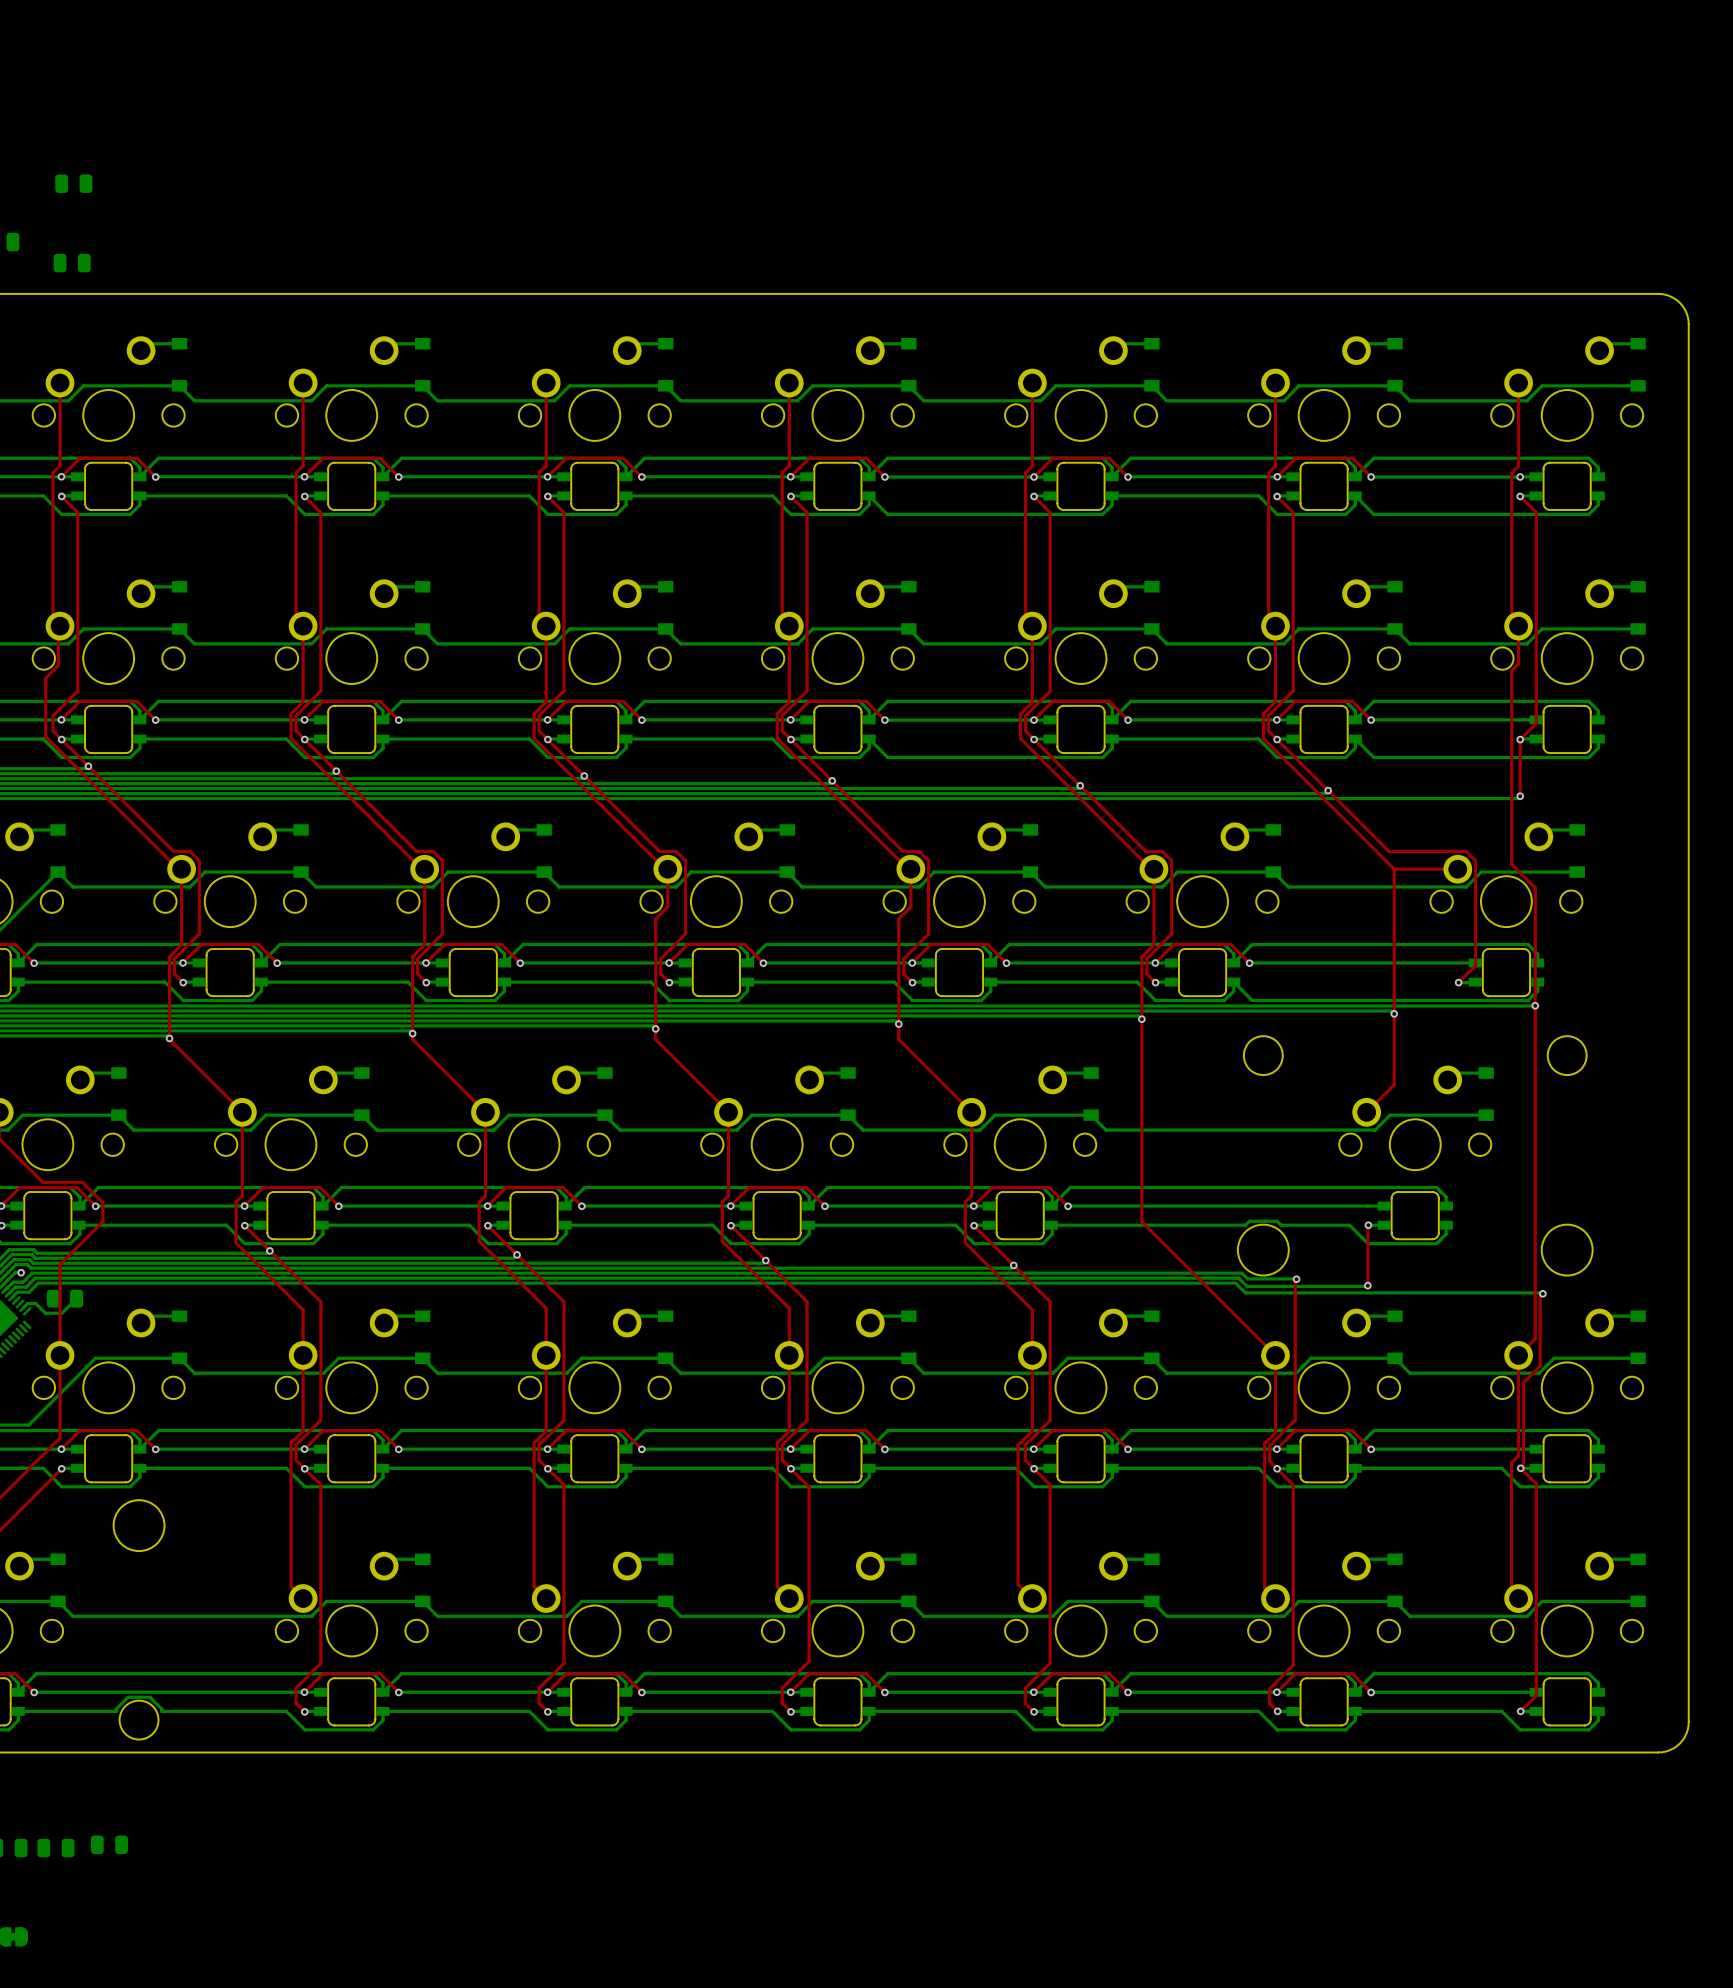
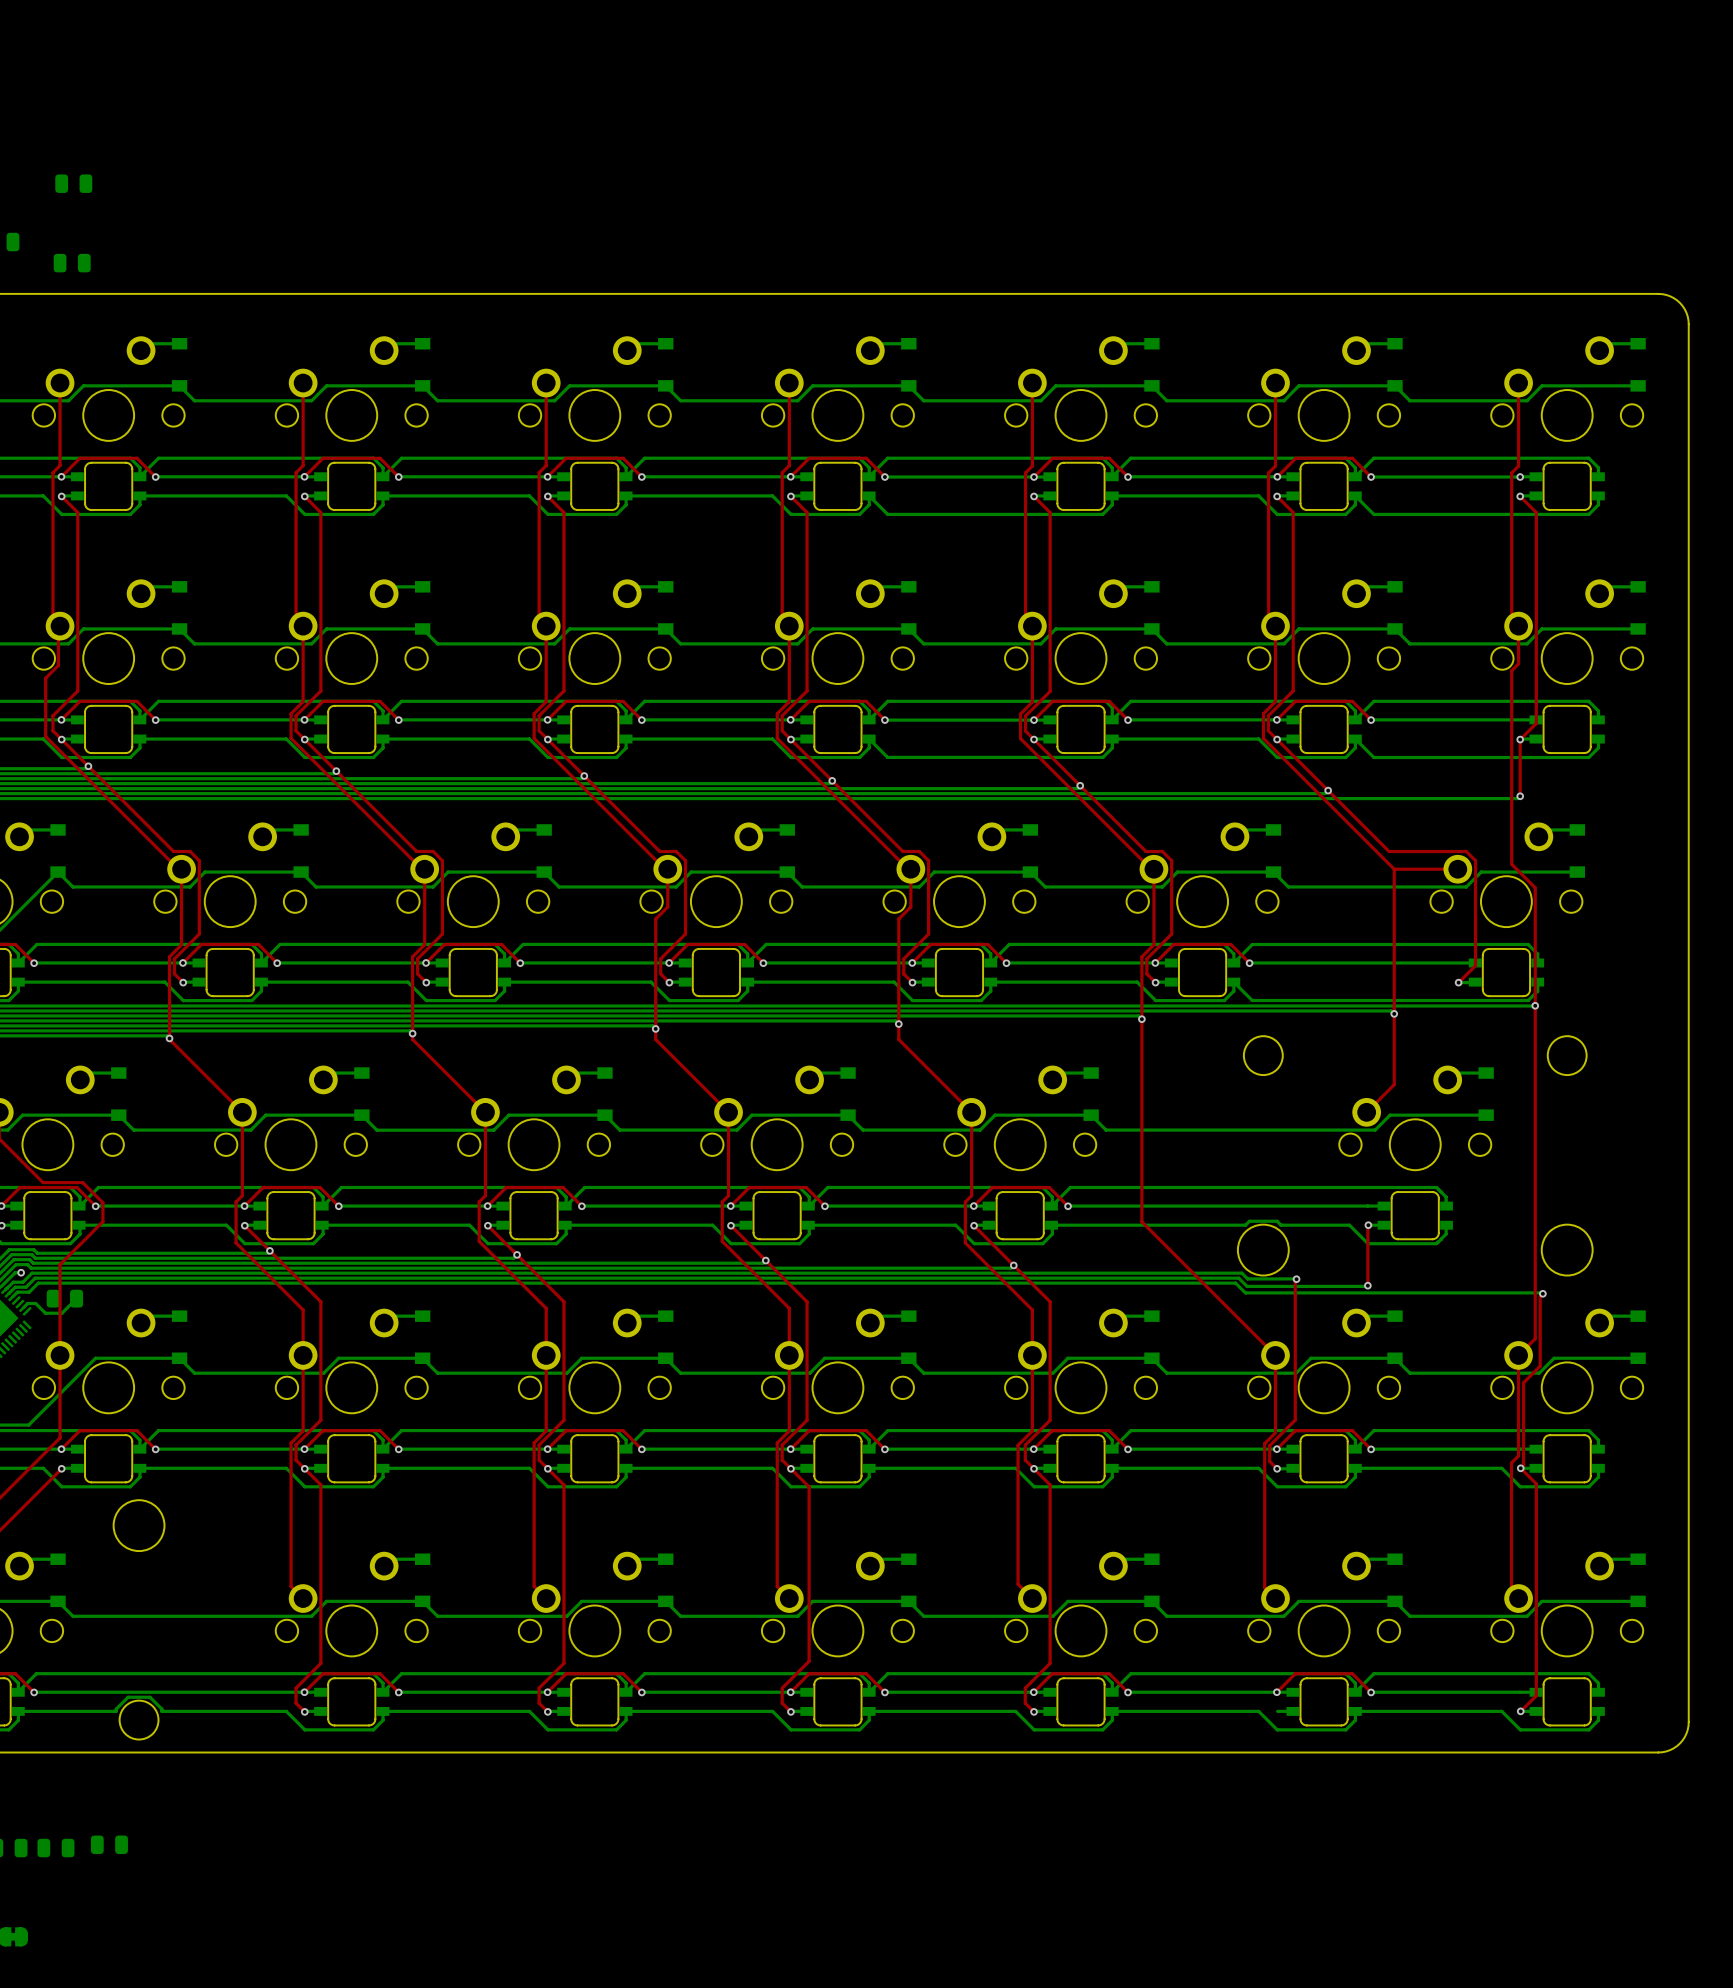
top track: (1277, 1468) (1293, 1484) (1293, 1665) (1269, 1688) (1269, 1703) (1277, 1711) -> none
via: (1277, 1711) -> none

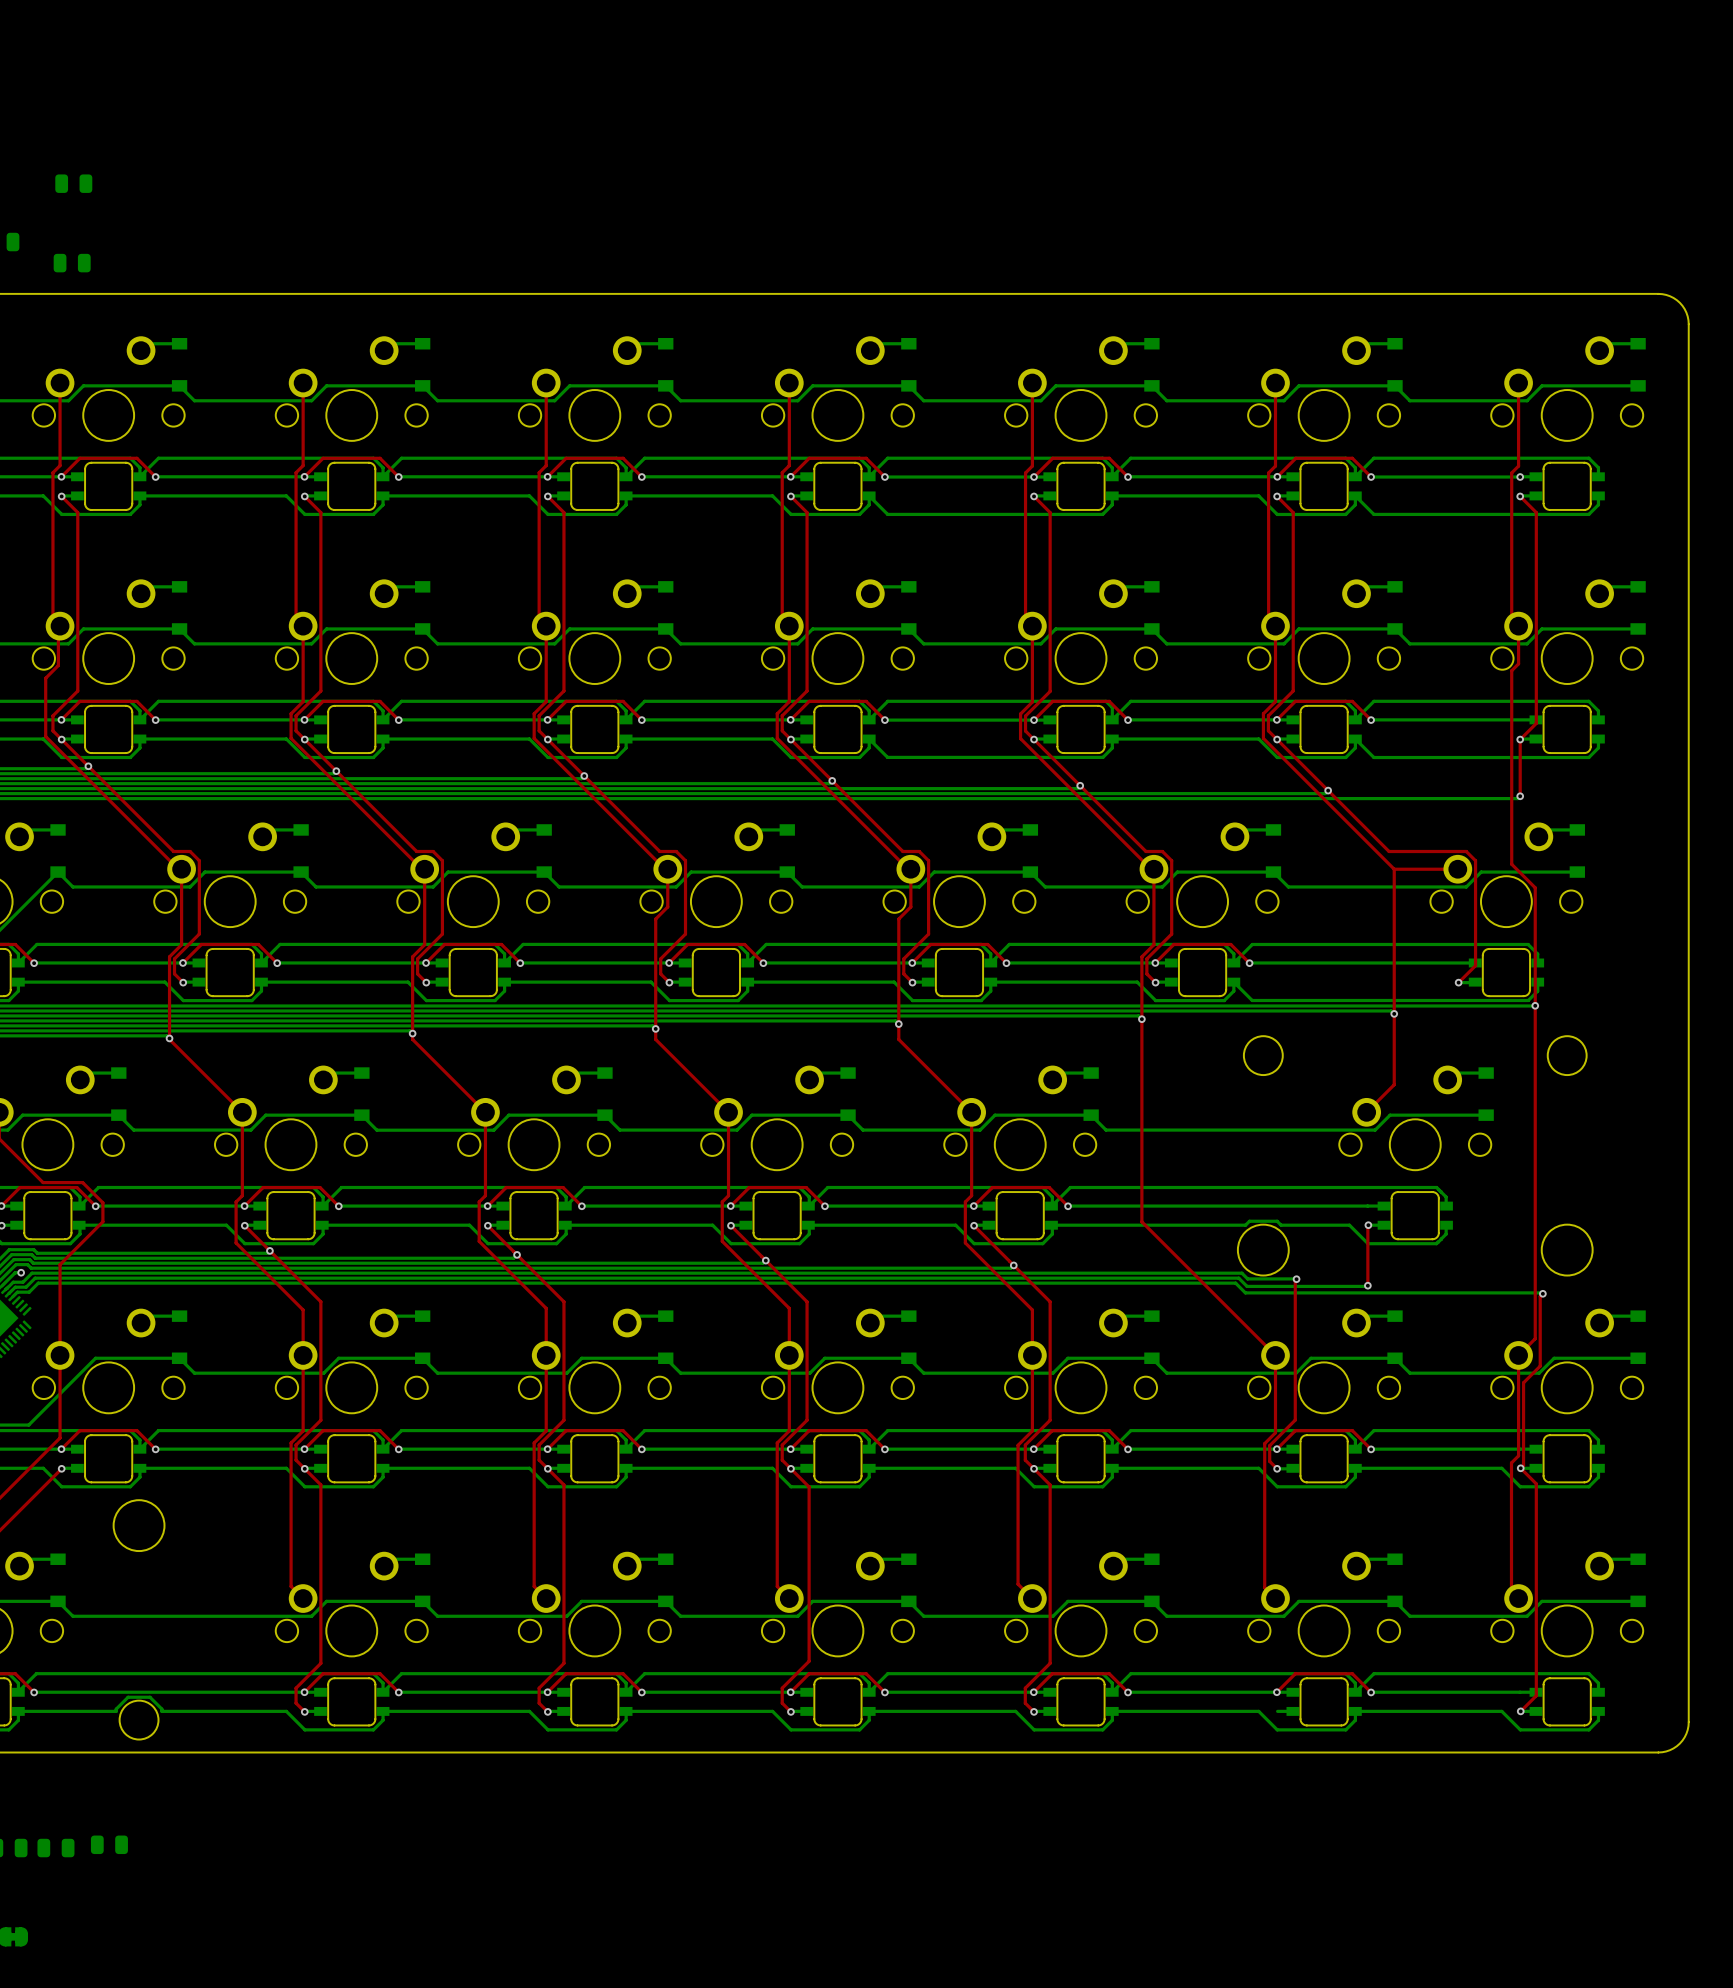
part: (64, 1298) -> none
bottom track: (76, 1298) (61, 1313) (45, 1313) (35, 1303) (27, 1303) (23, 1307) -> none

